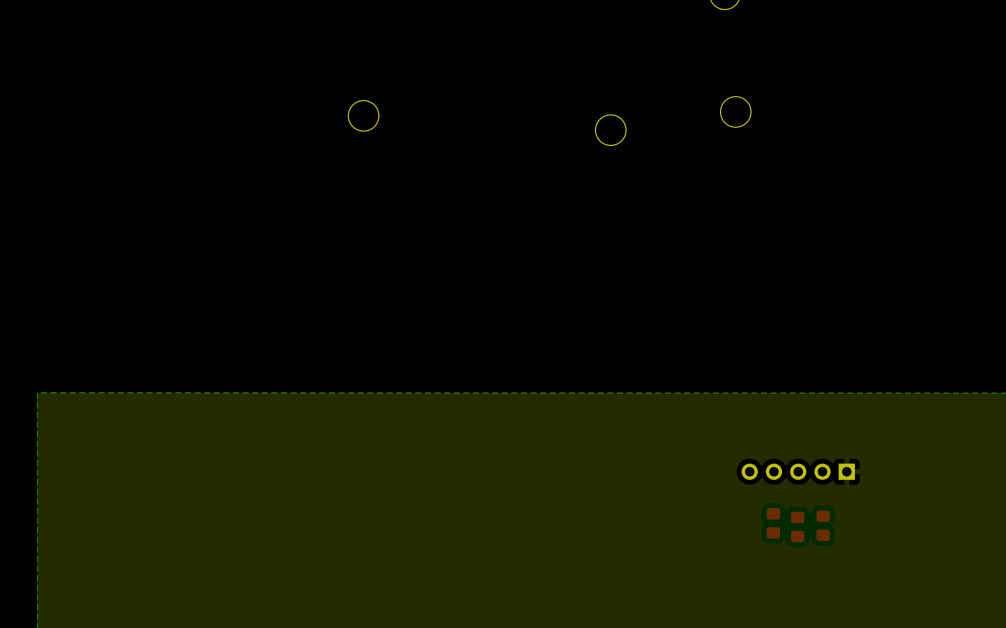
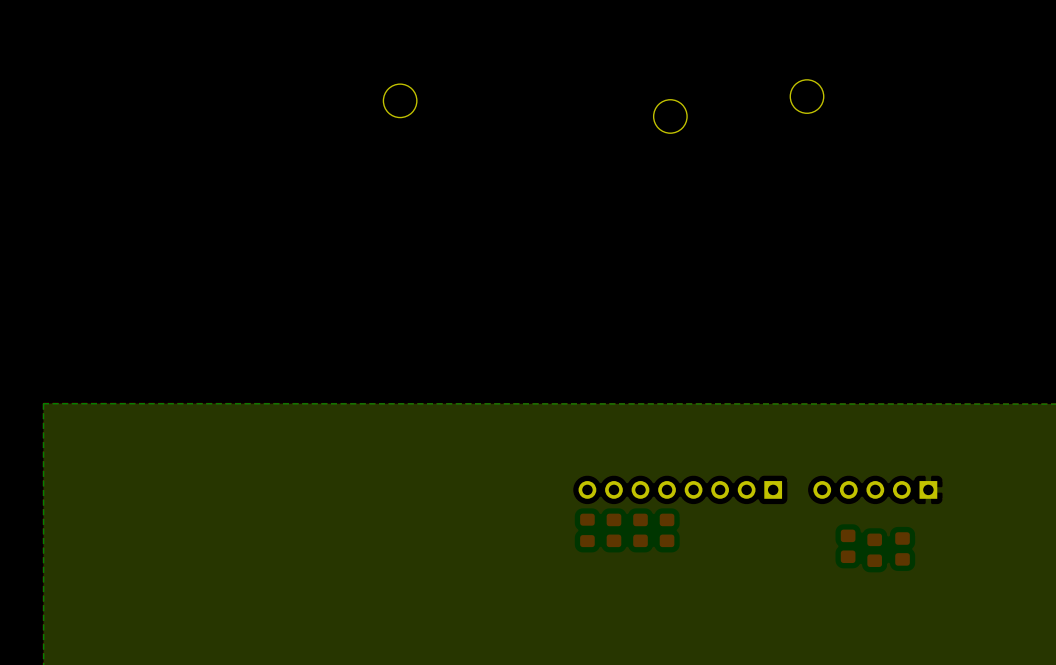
part: none -> (680, 489)
part: none -> (587, 530)
part: none -> (613, 530)
part: none -> (640, 530)
part: none -> (667, 530)

